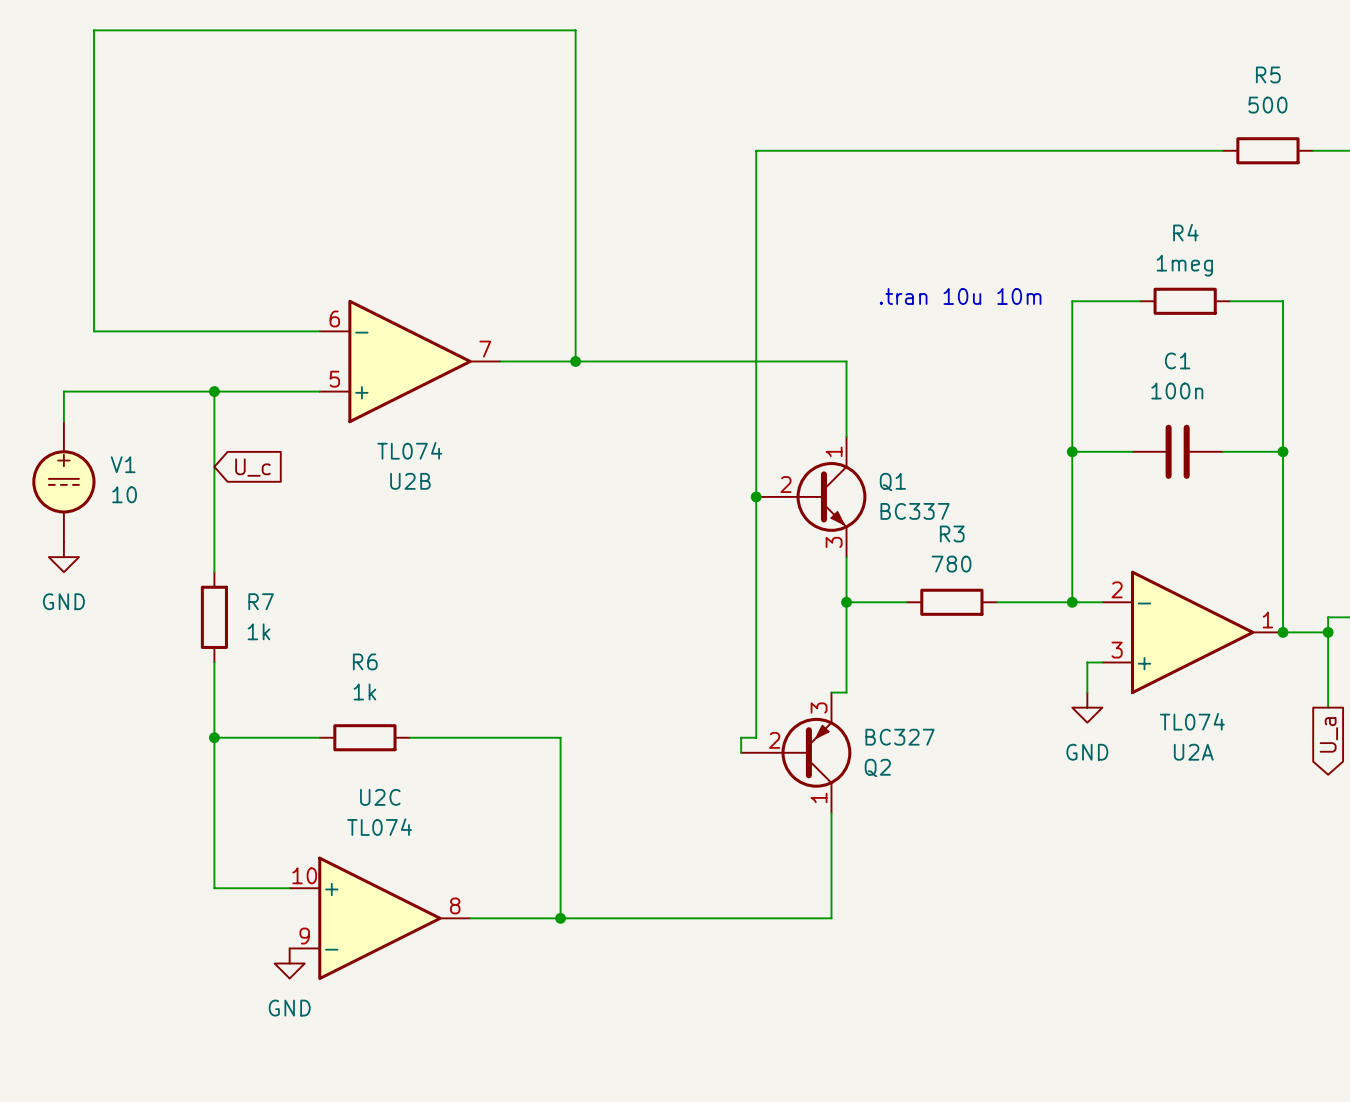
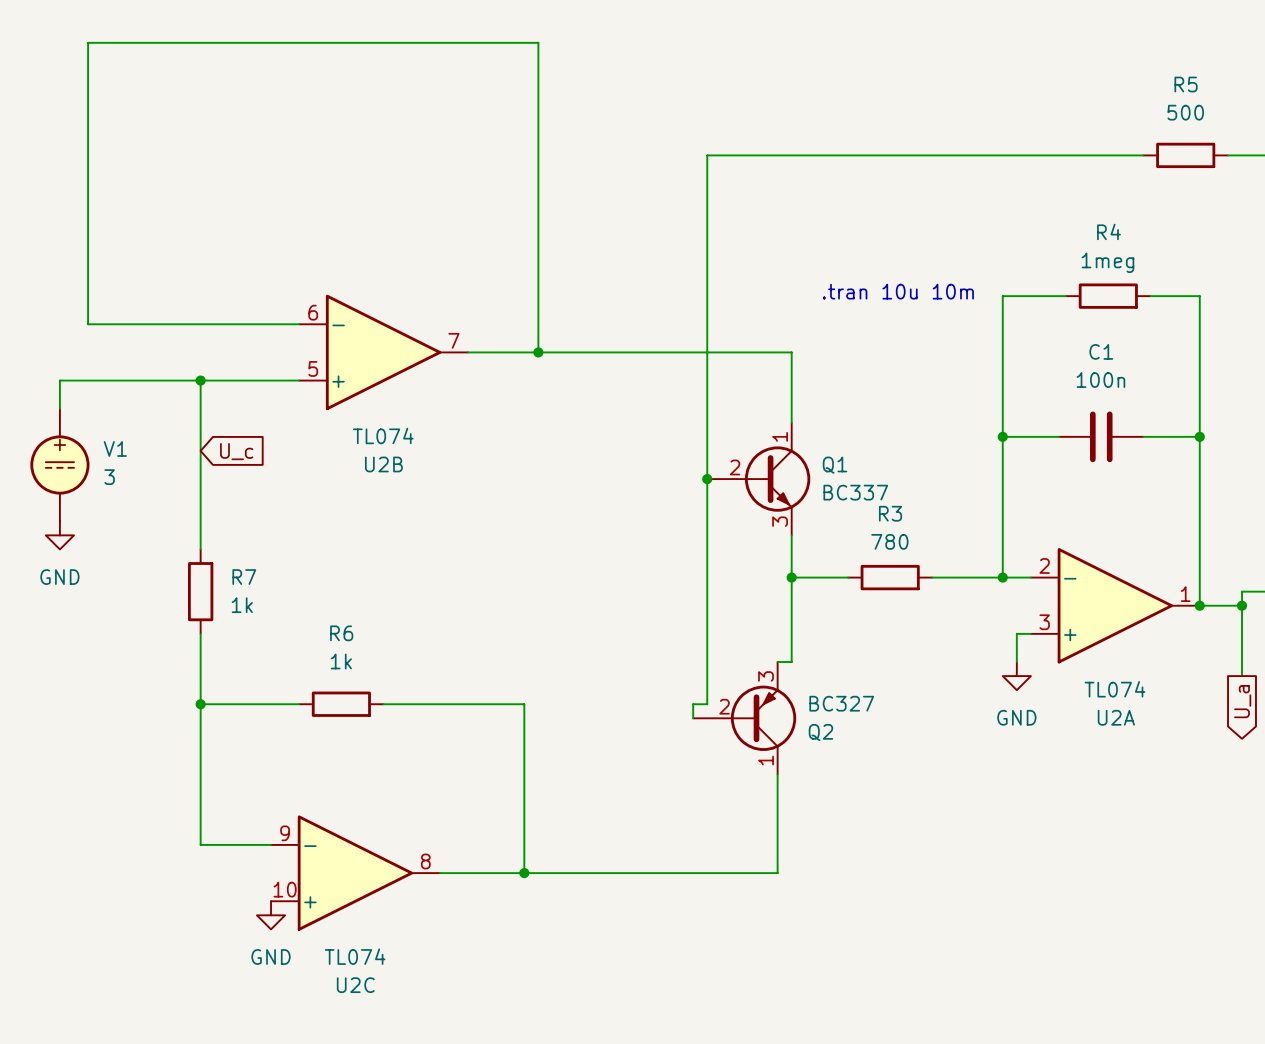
V1 value: 10 (124, 494) -> 3 (109, 477)
U2C flip: as is (379, 918) -> up-down (355, 873)

